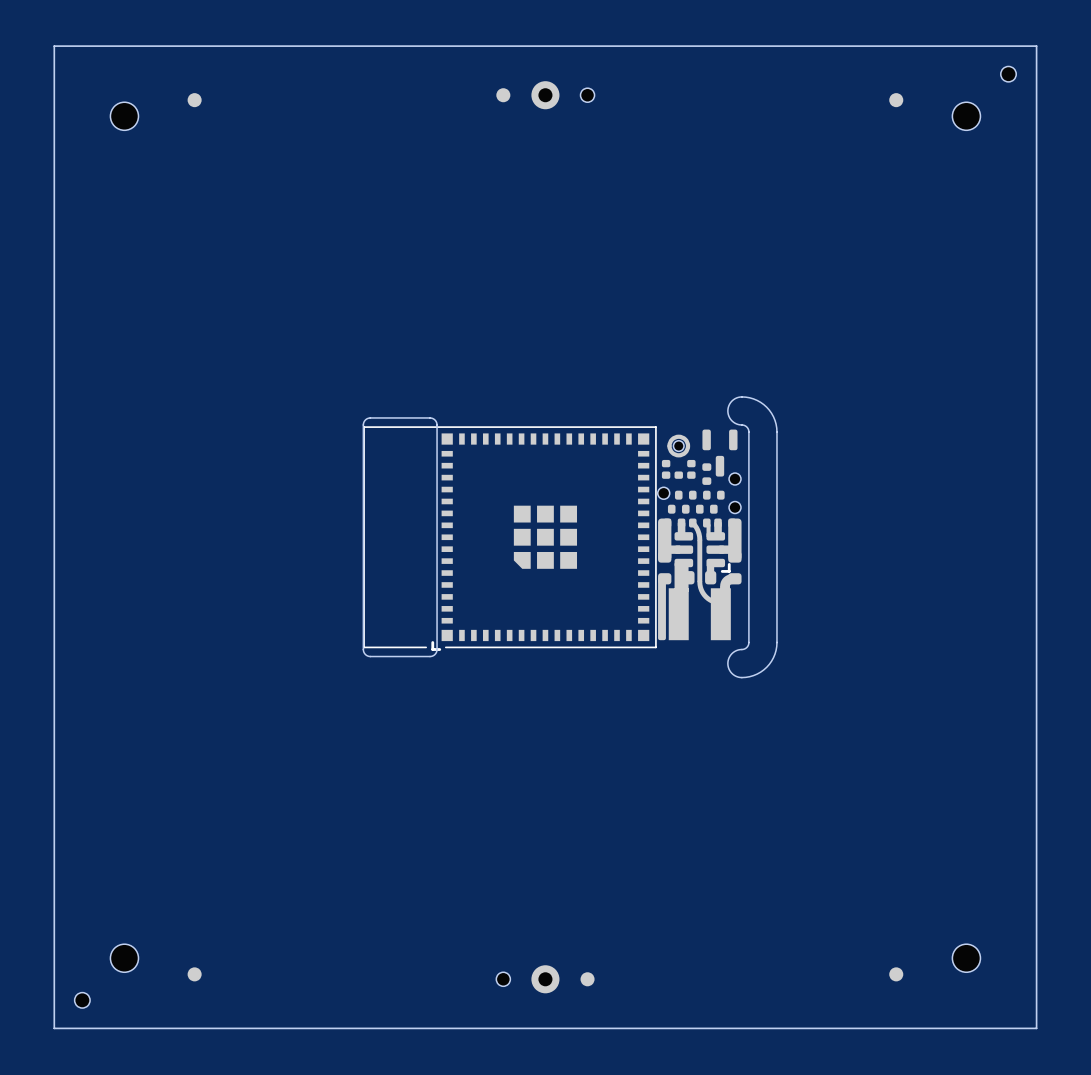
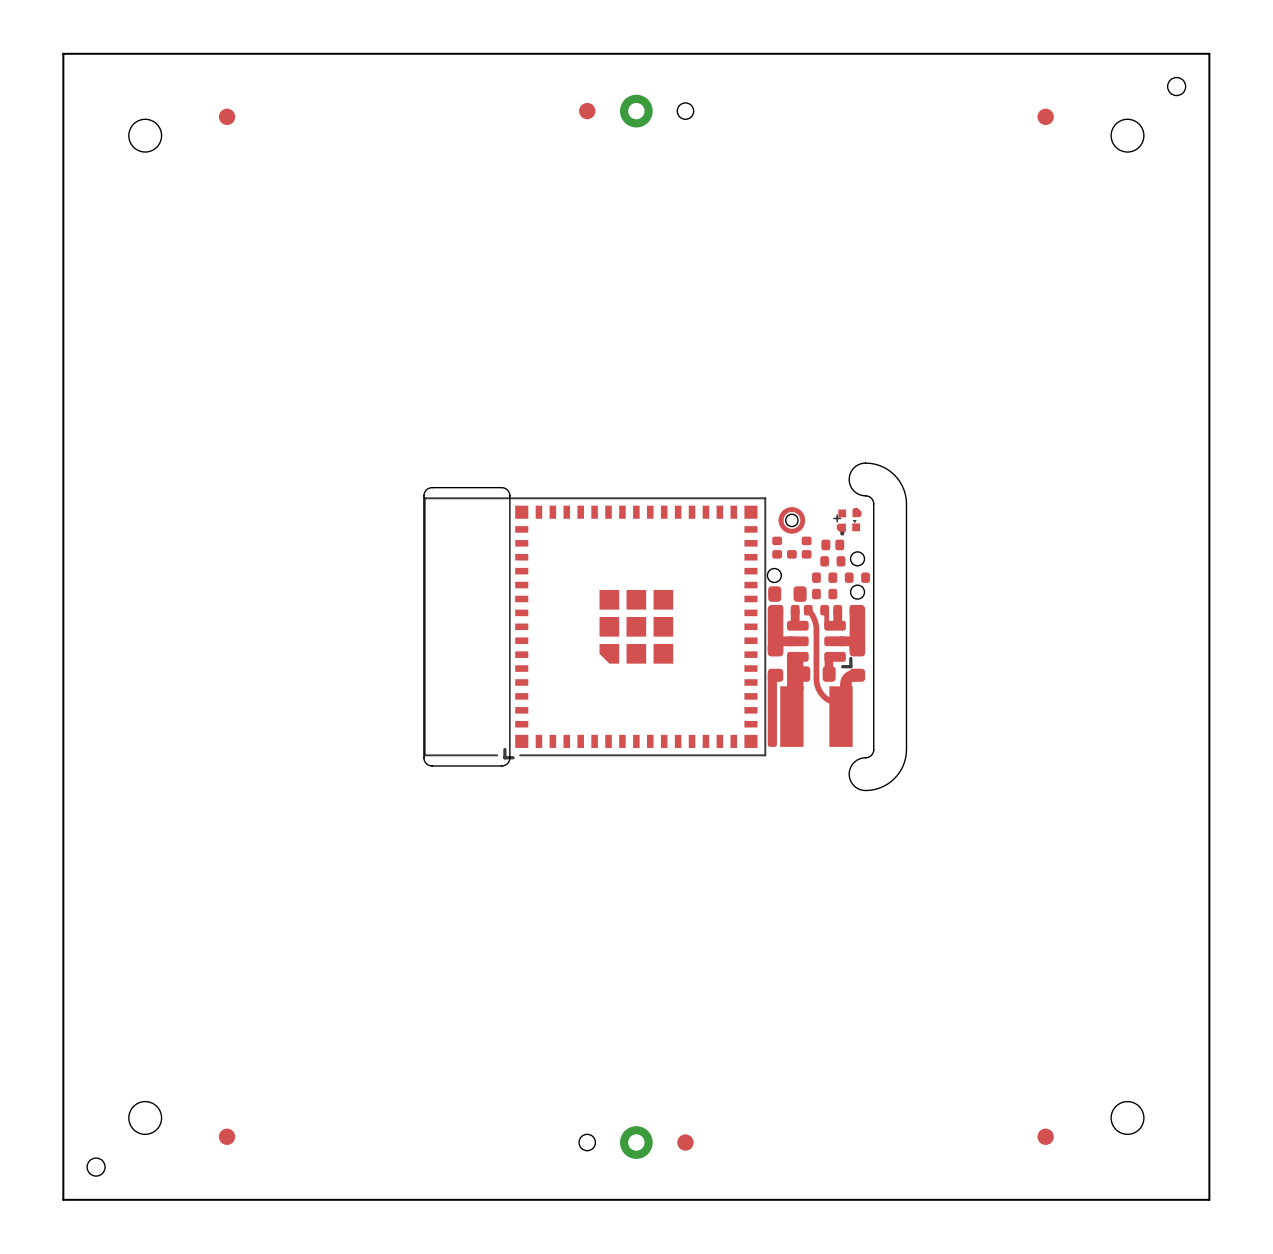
part: none -> (847, 521)
part: (719, 453) -> none
part: none -> (832, 544)
part: (706, 474) -> none
part: none -> (832, 561)
part: (685, 495) -> none
part: none -> (824, 577)
part: (713, 495) -> none
part: none -> (857, 577)
part footprint: [667, 504, 690, 514] -> [768, 586, 807, 602]

